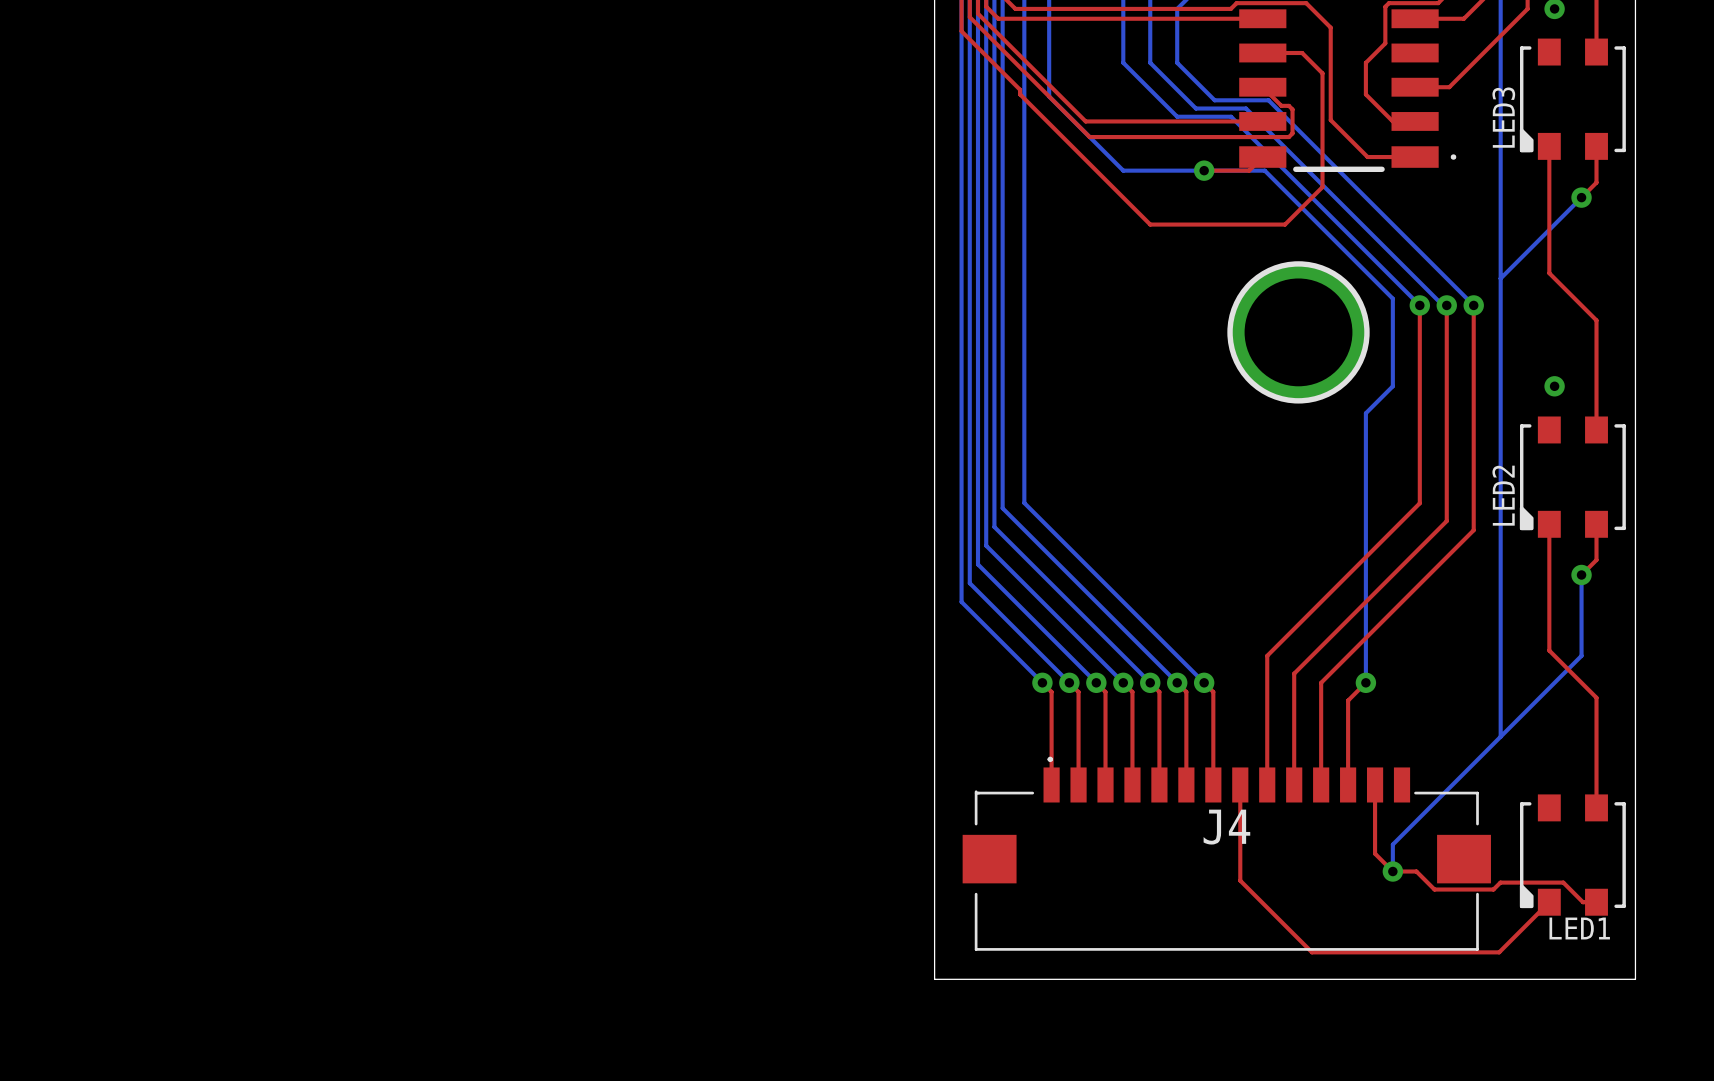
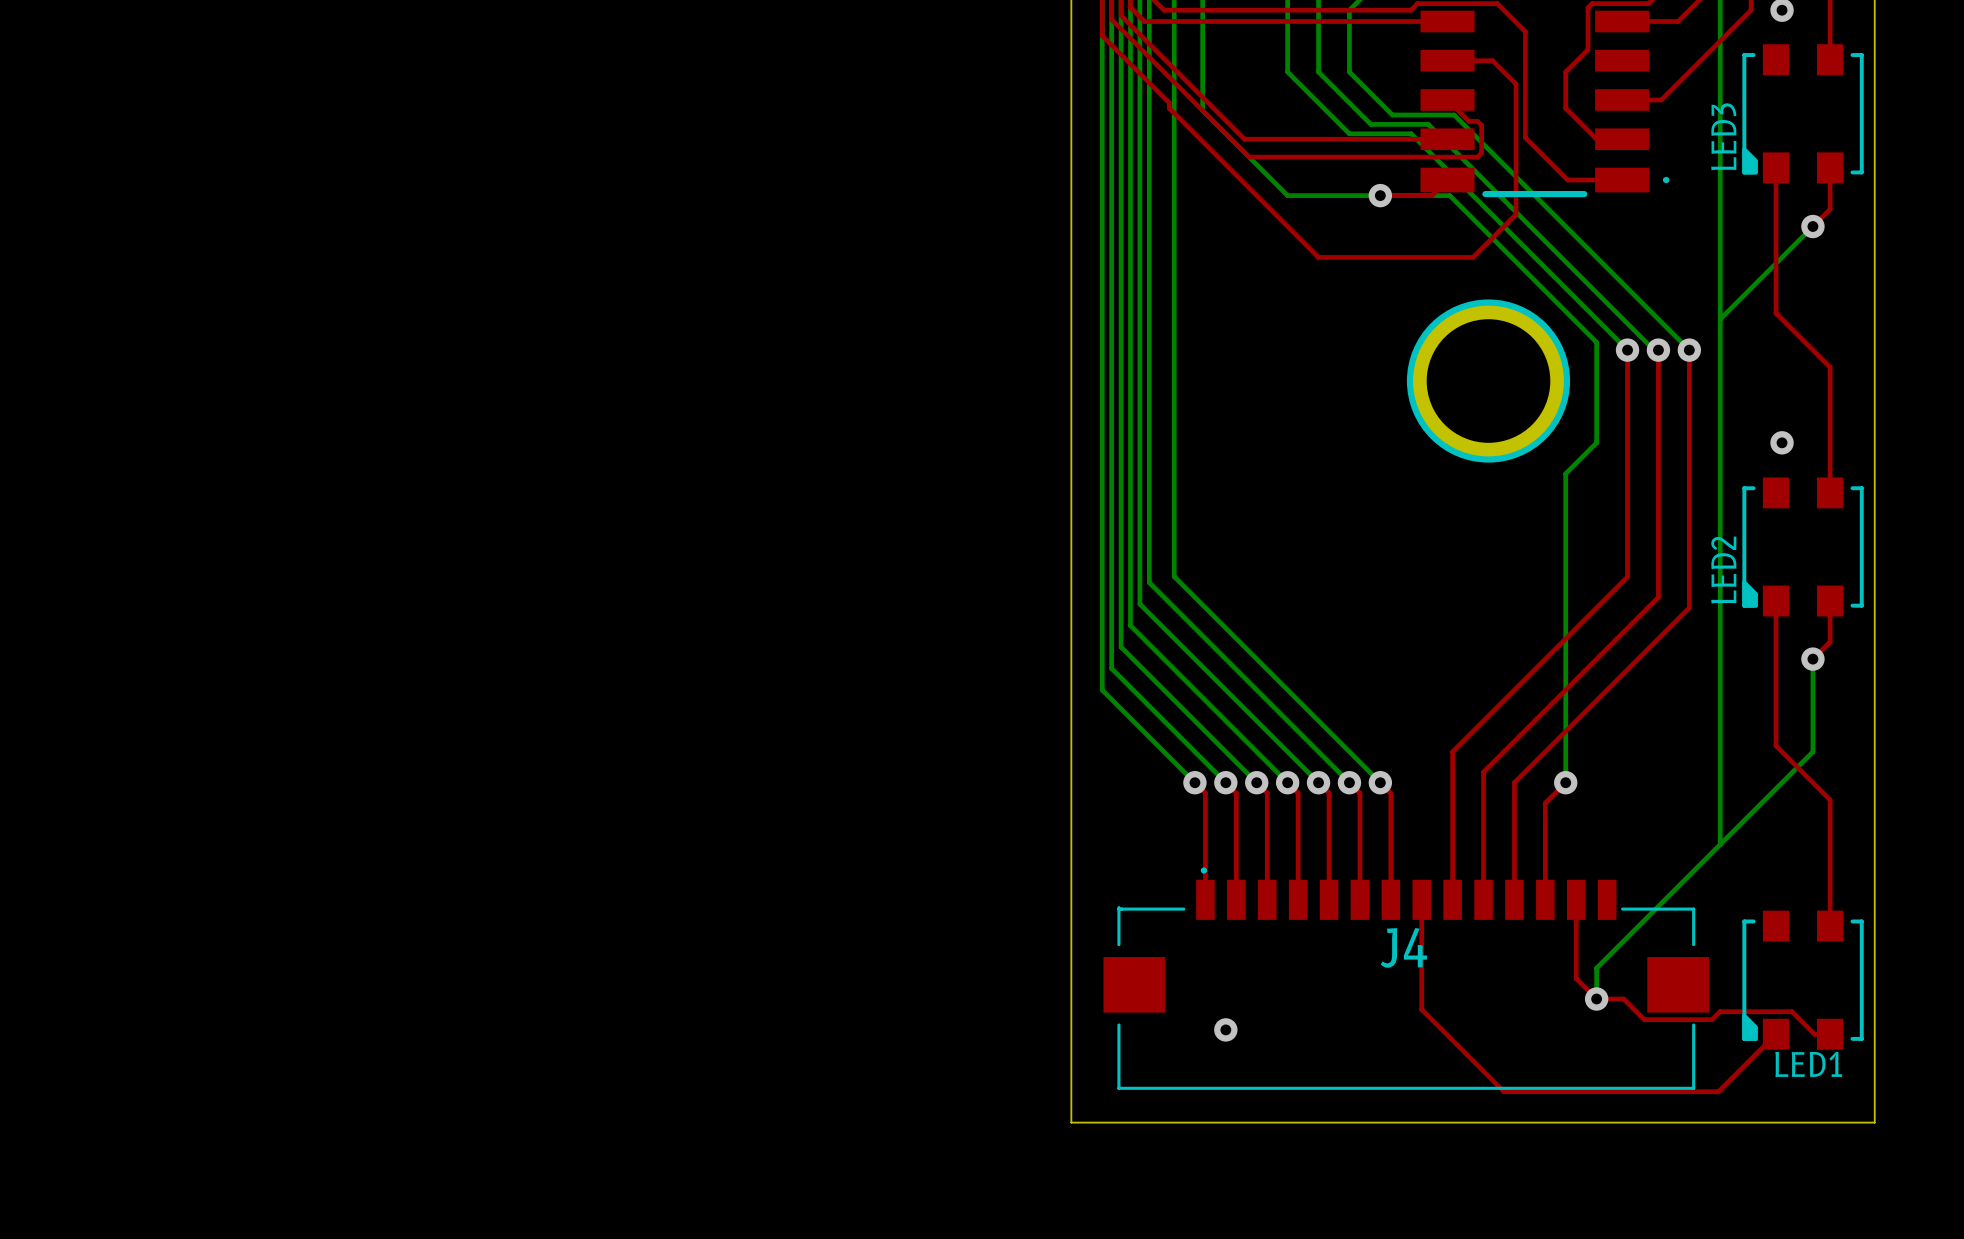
via: none -> (1225, 1029)

